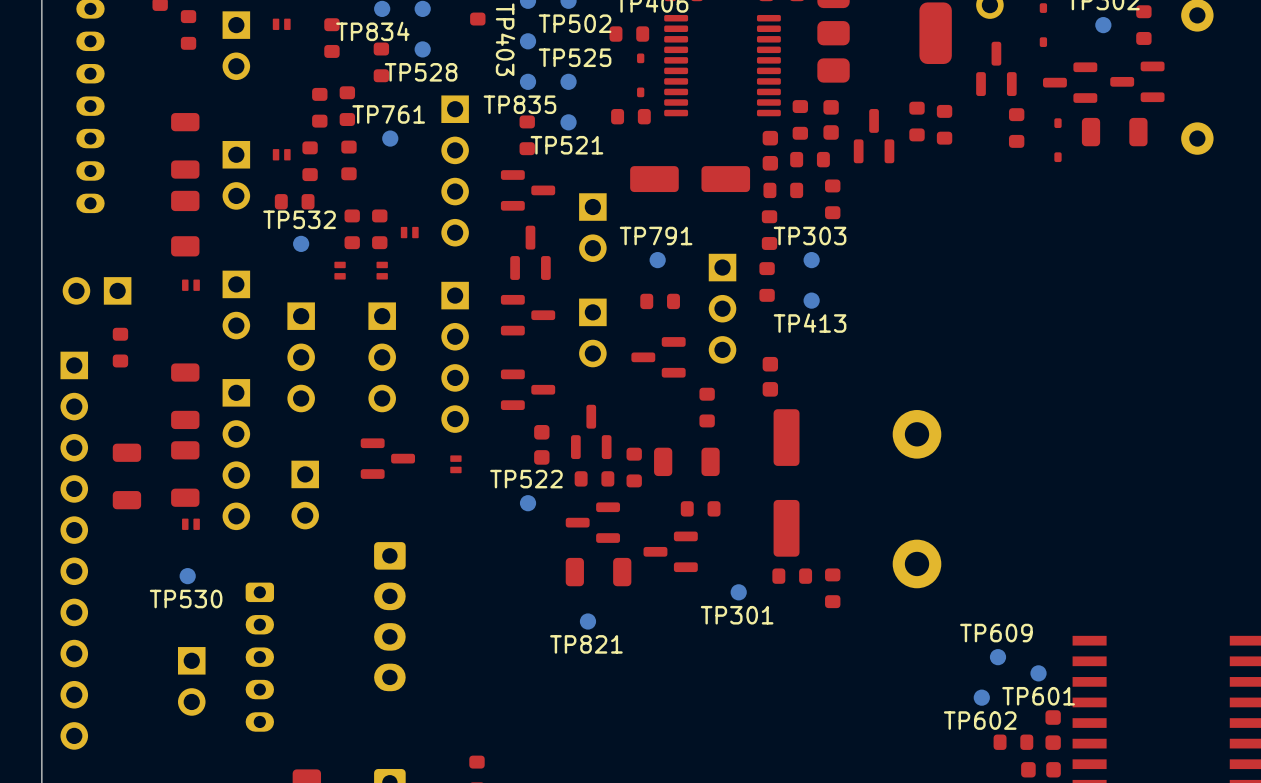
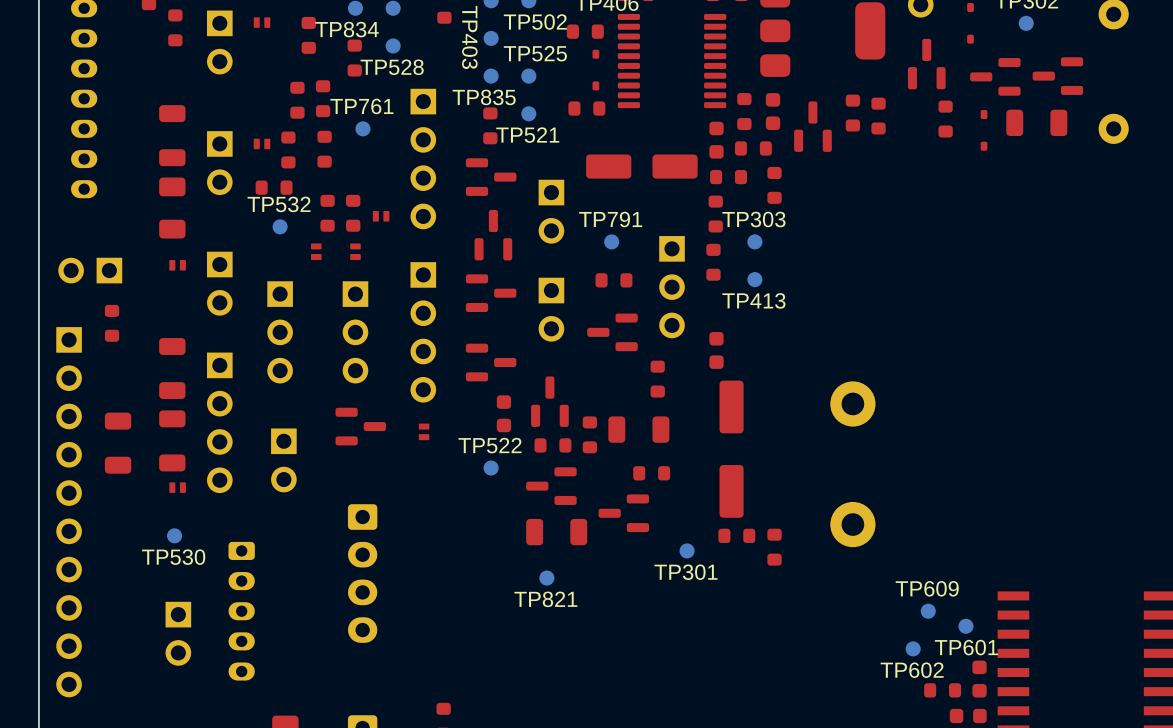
part: (1143, 25) -> none

